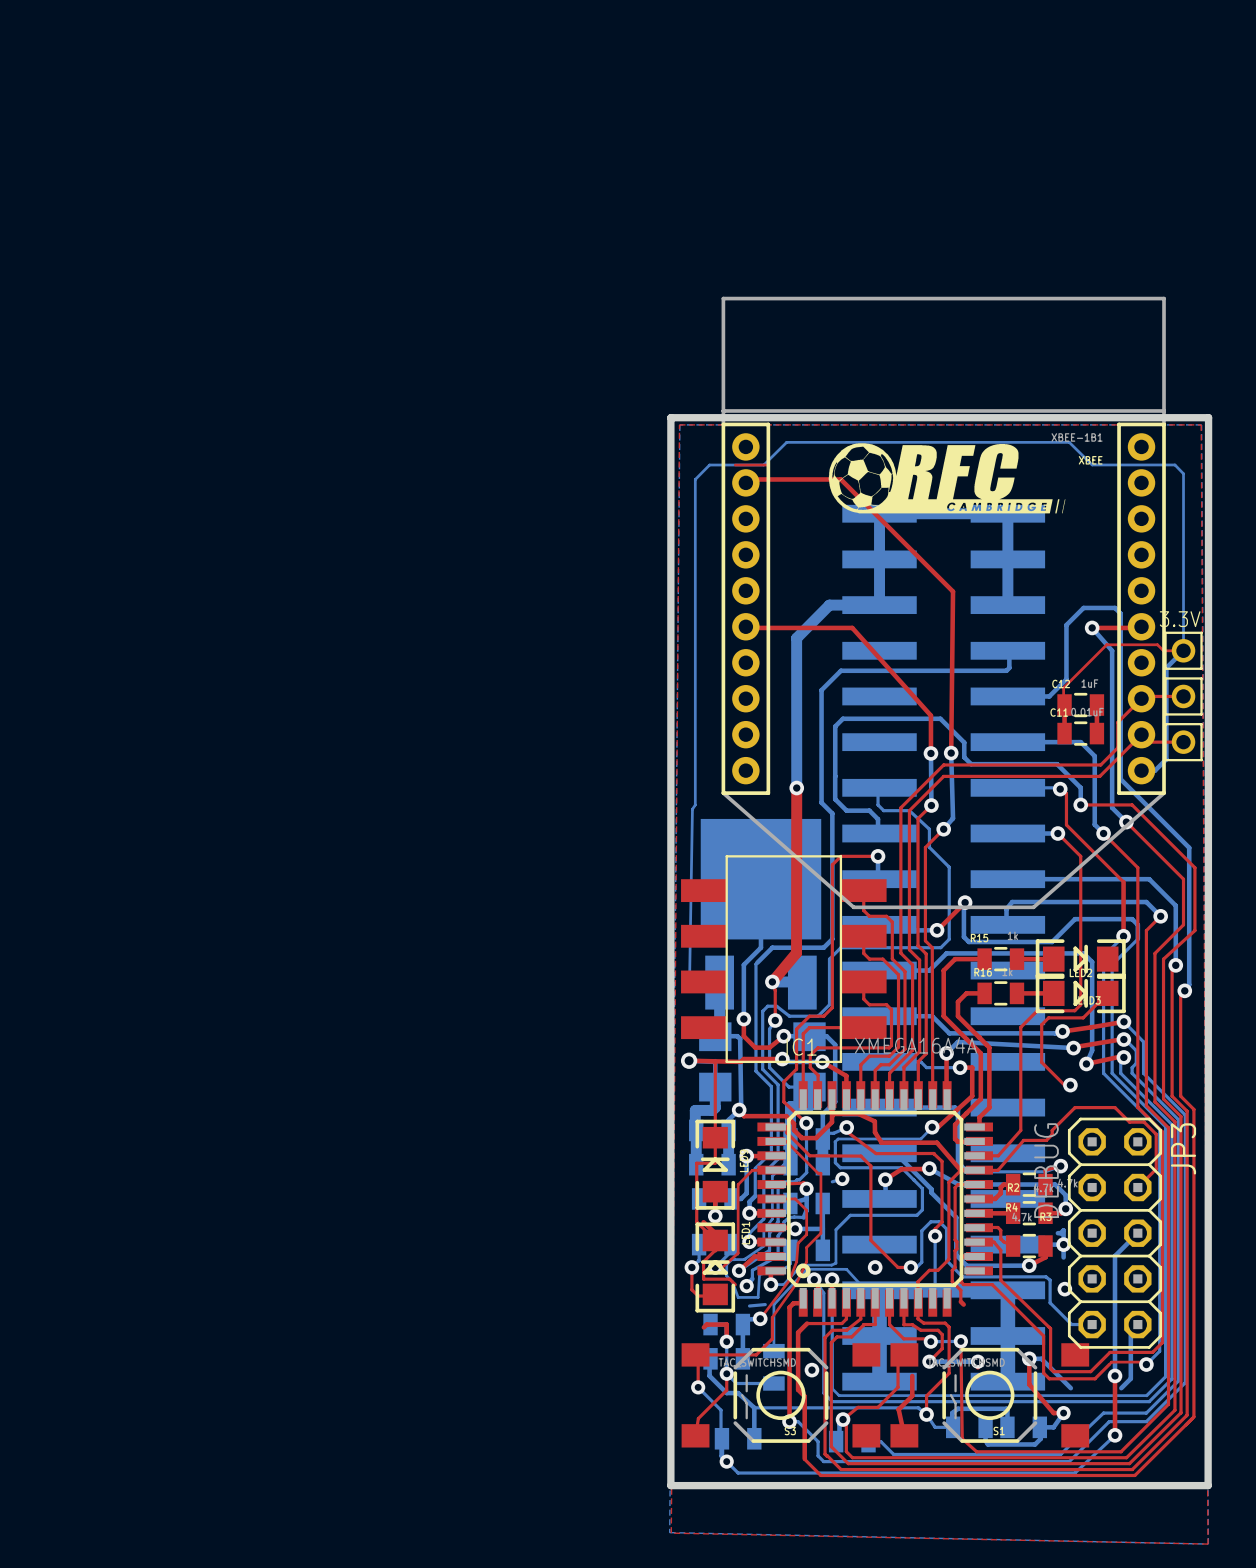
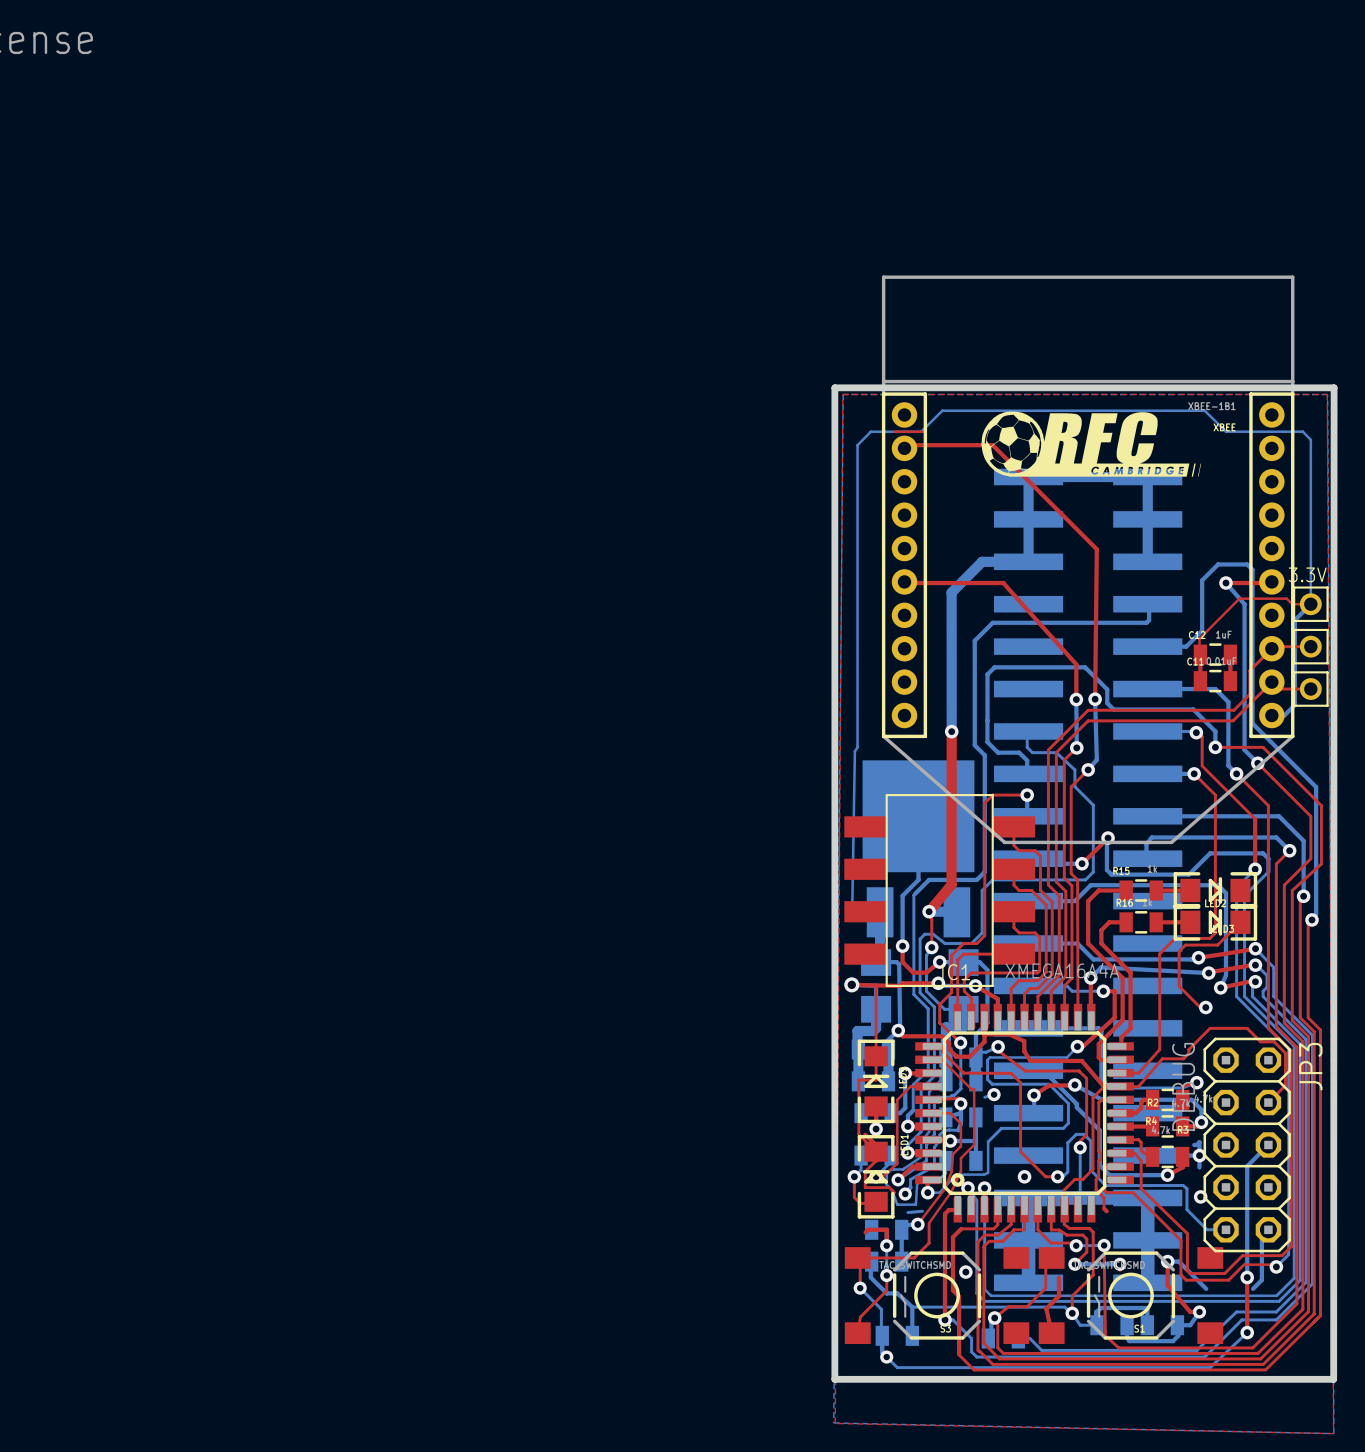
bottom track: (879, 1290) (865, 1290) (846, 1269) (806, 1269) (773, 1304) (773, 1351) -> none
part: (773, 1367) -> none
bottom track: (726, 1373) (736, 1383) (773, 1383) -> none

